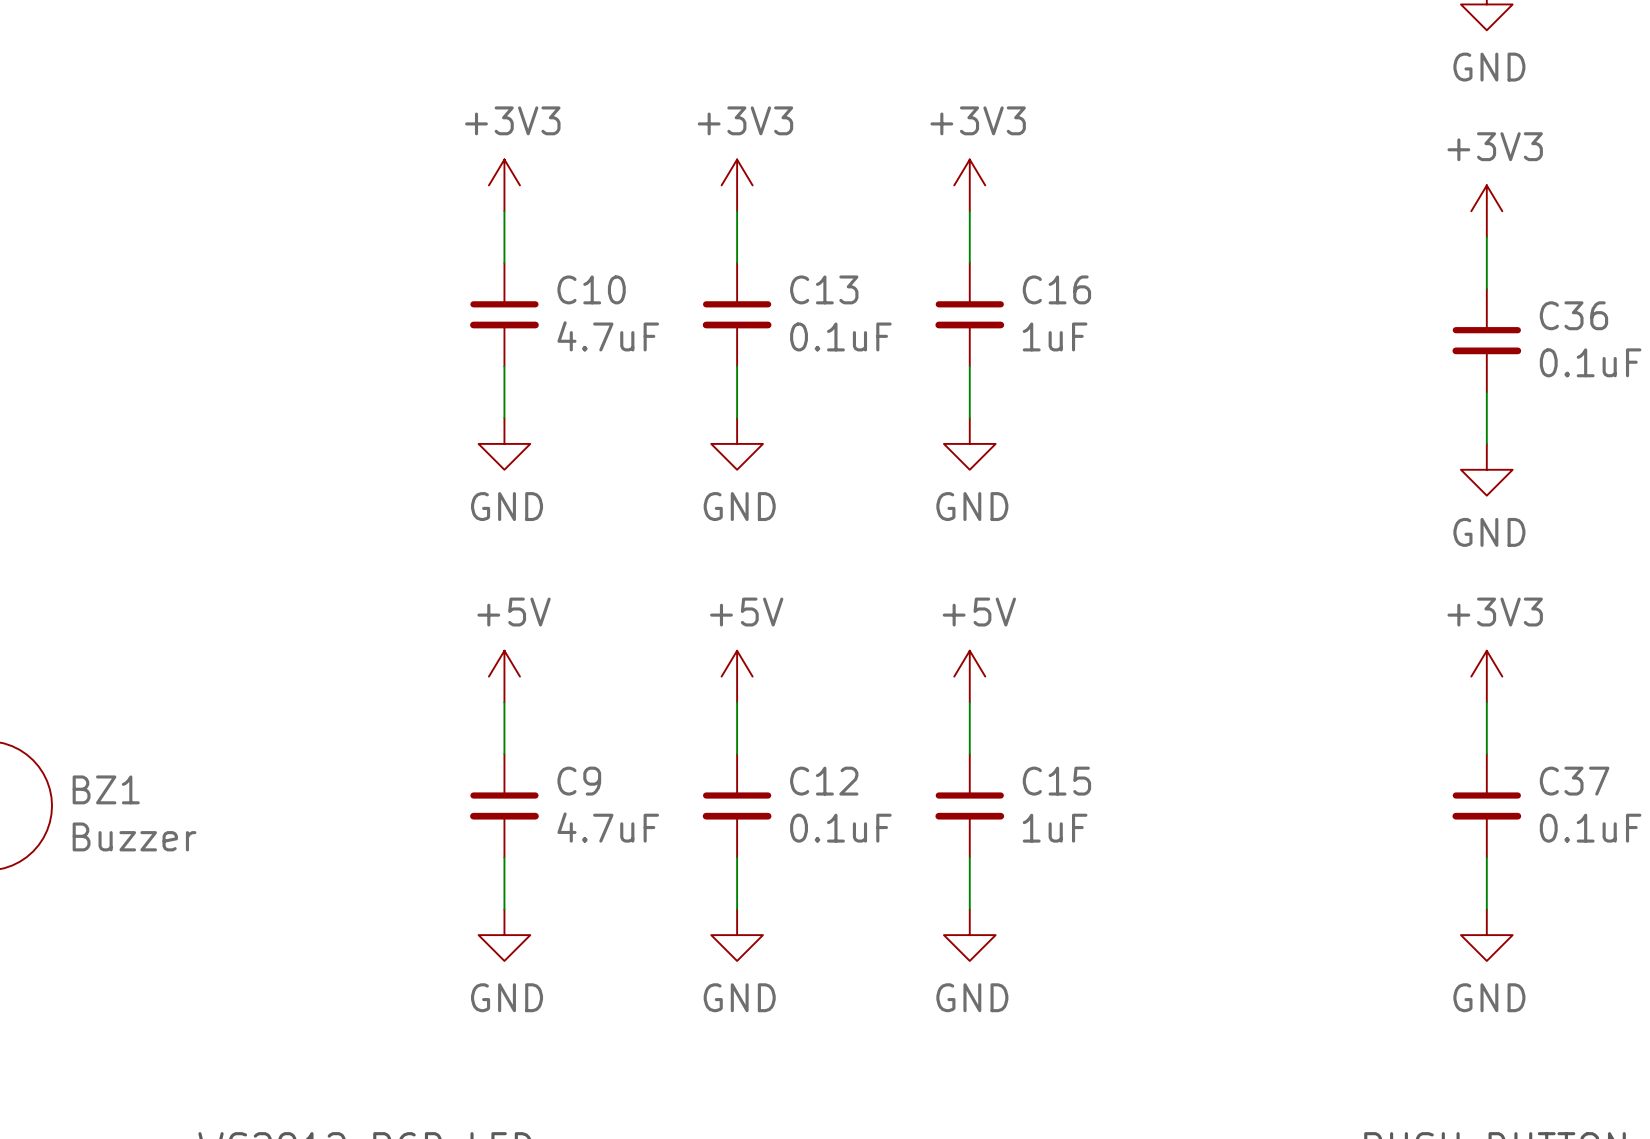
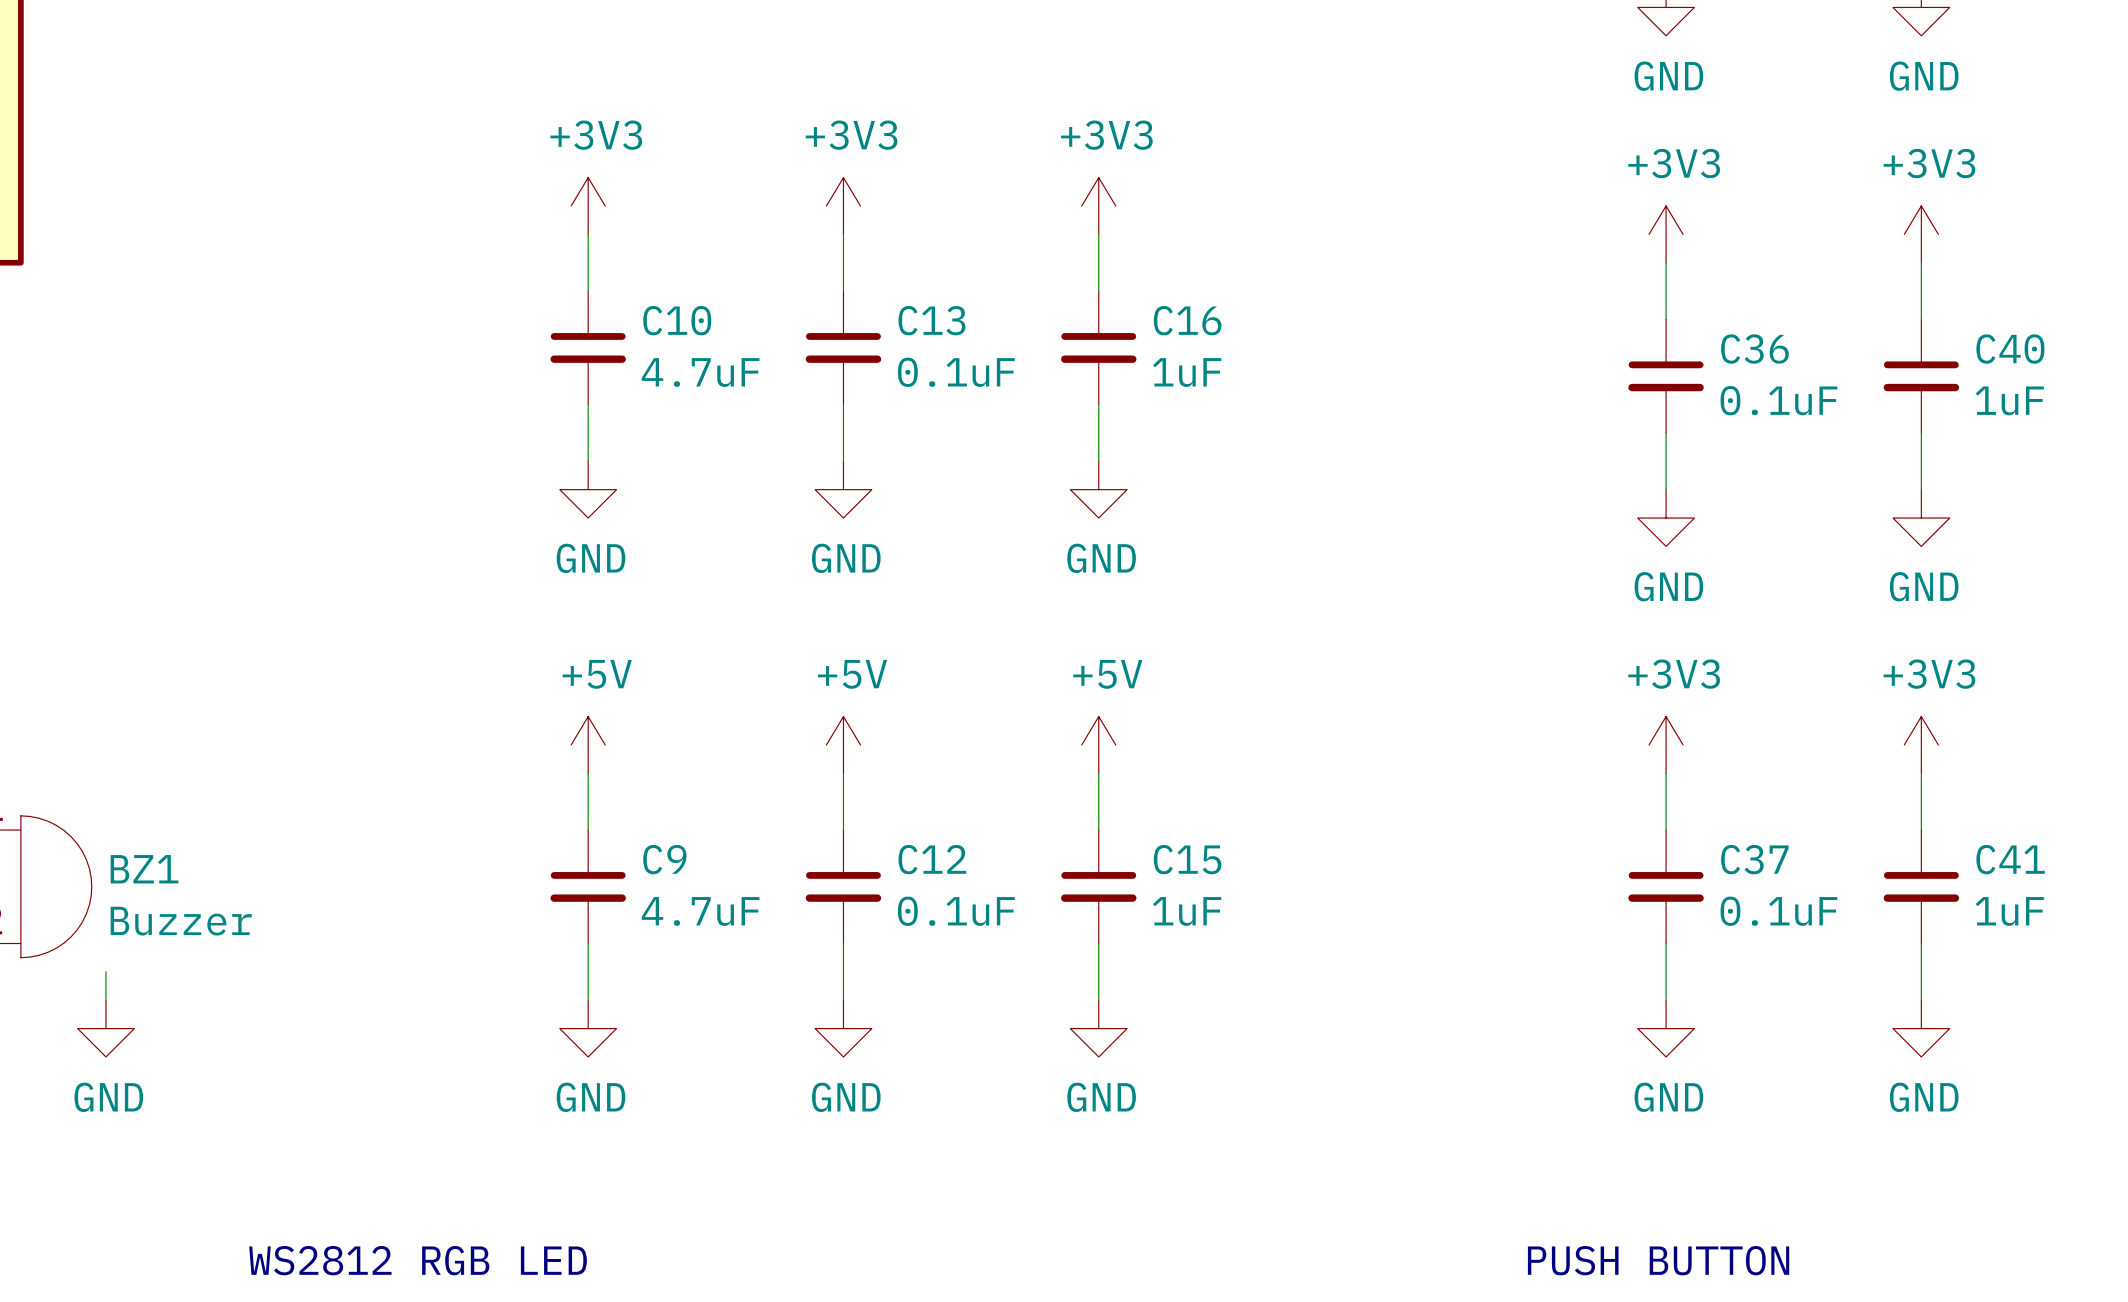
wire: none -> (105, 971) (105, 1000)
power symbol: none -> GND (105, 1028)

